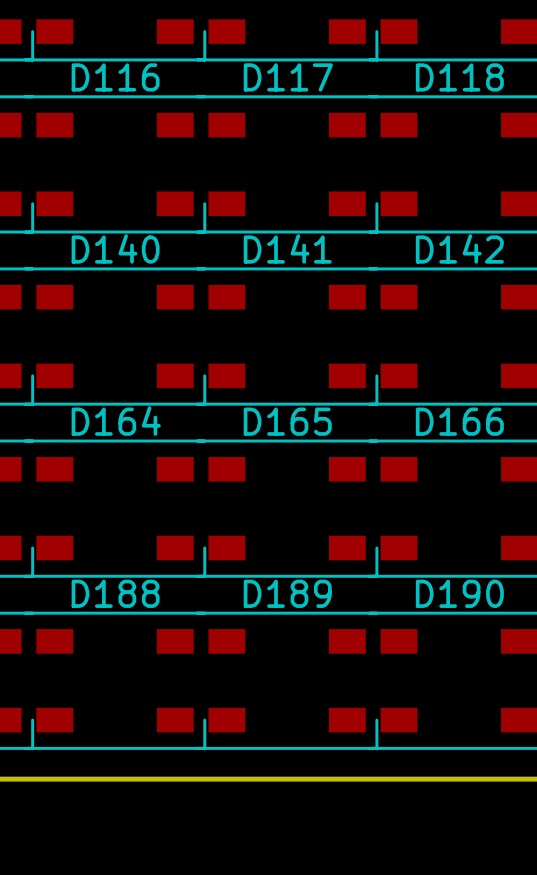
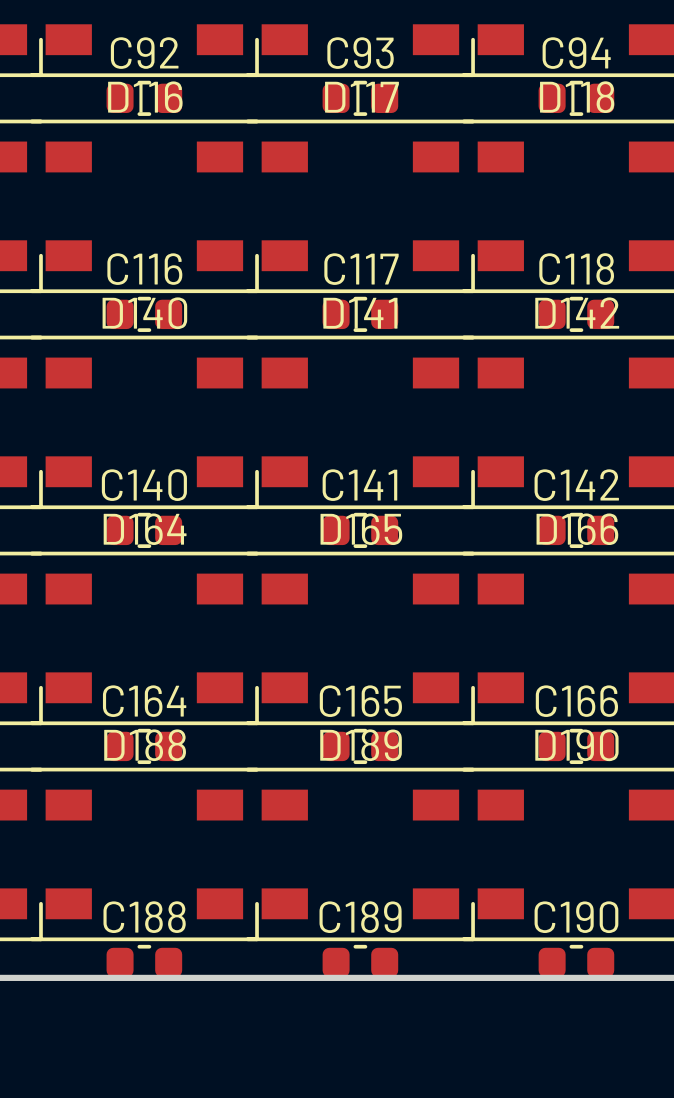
C92: none -> (144, 98)
C93: none -> (360, 98)
C94: none -> (576, 98)
C116: none -> (144, 314)
C117: none -> (360, 314)
C118: none -> (576, 314)
C140: none -> (144, 530)
C141: none -> (360, 530)
C142: none -> (576, 530)
C164: none -> (144, 746)
C165: none -> (360, 746)
C166: none -> (576, 746)
C188: none -> (144, 962)
C189: none -> (360, 962)
C190: none -> (576, 962)

